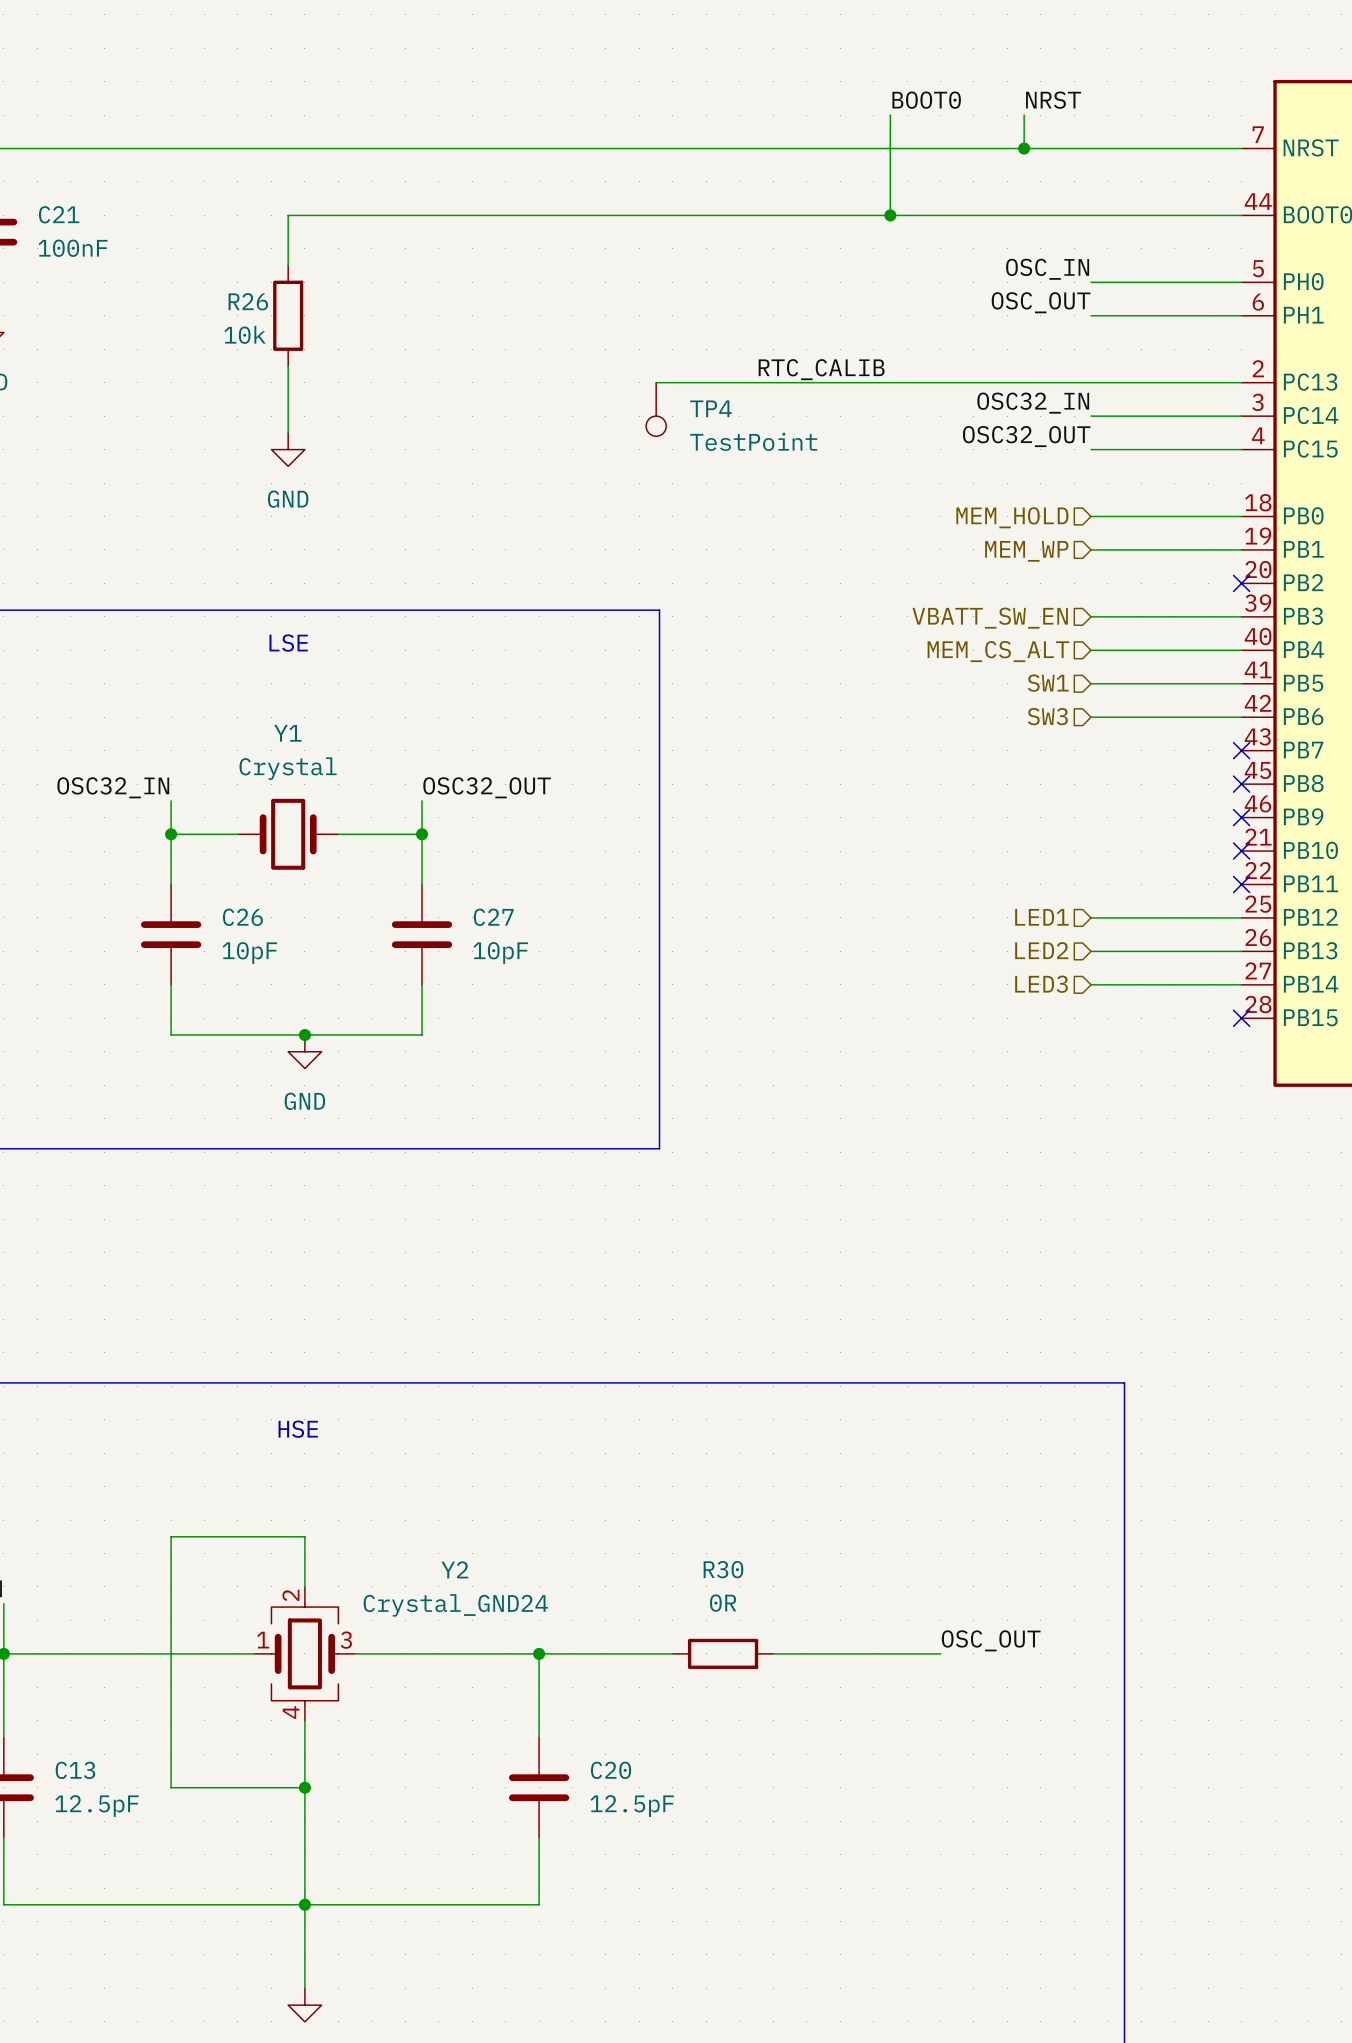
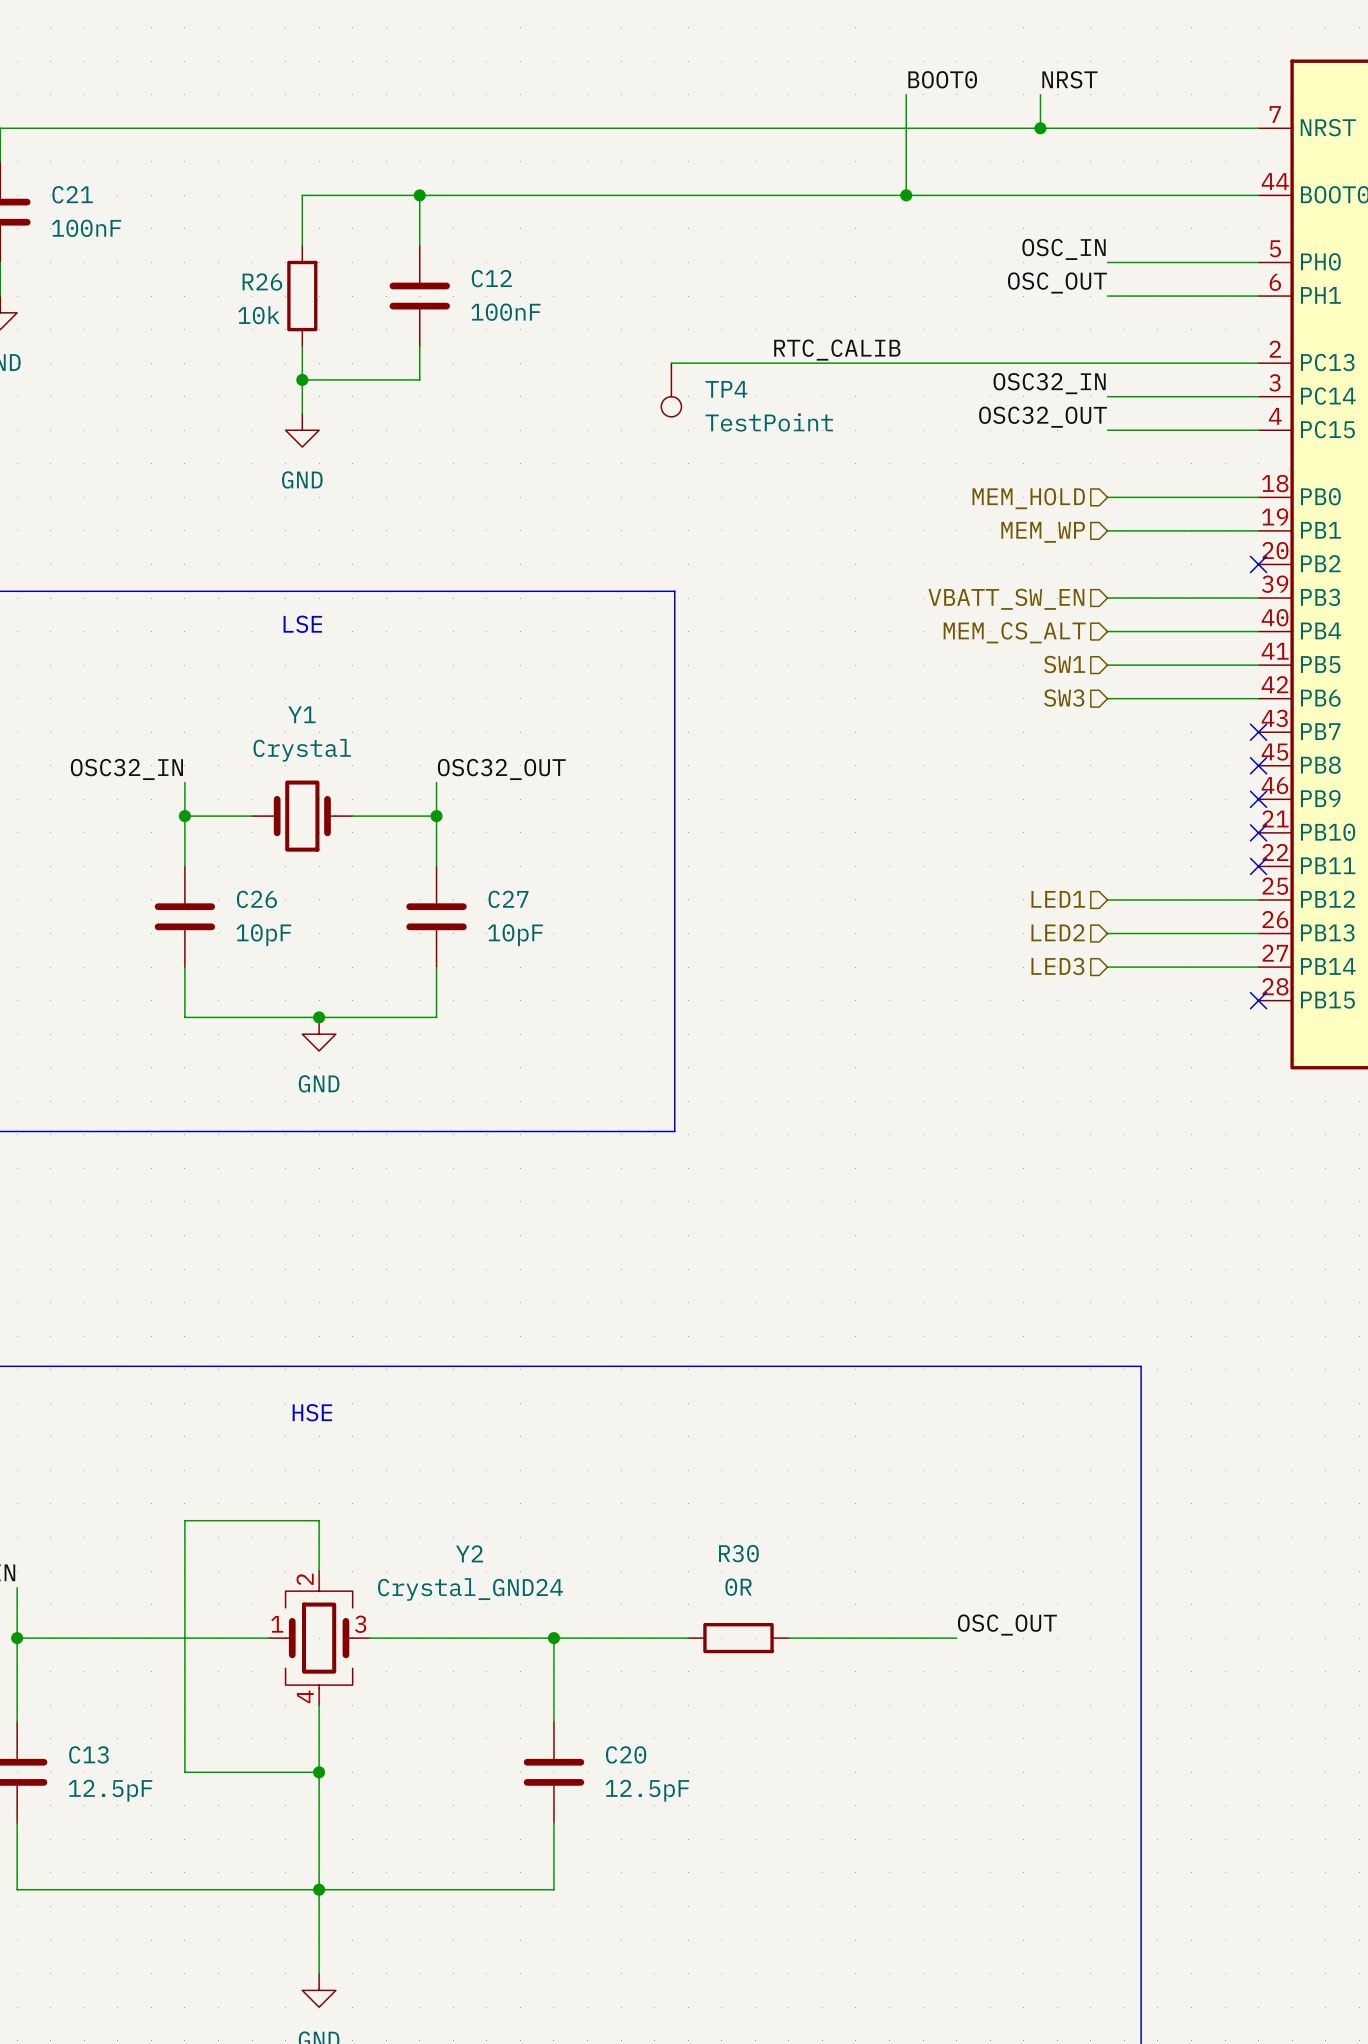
wire: none -> (419, 195) (419, 245)
junction: none -> (419, 195)
C12: none -> 100nF (419, 296)
wire: none -> (419, 346) (419, 379) (302, 379)
junction: none -> (302, 379)

